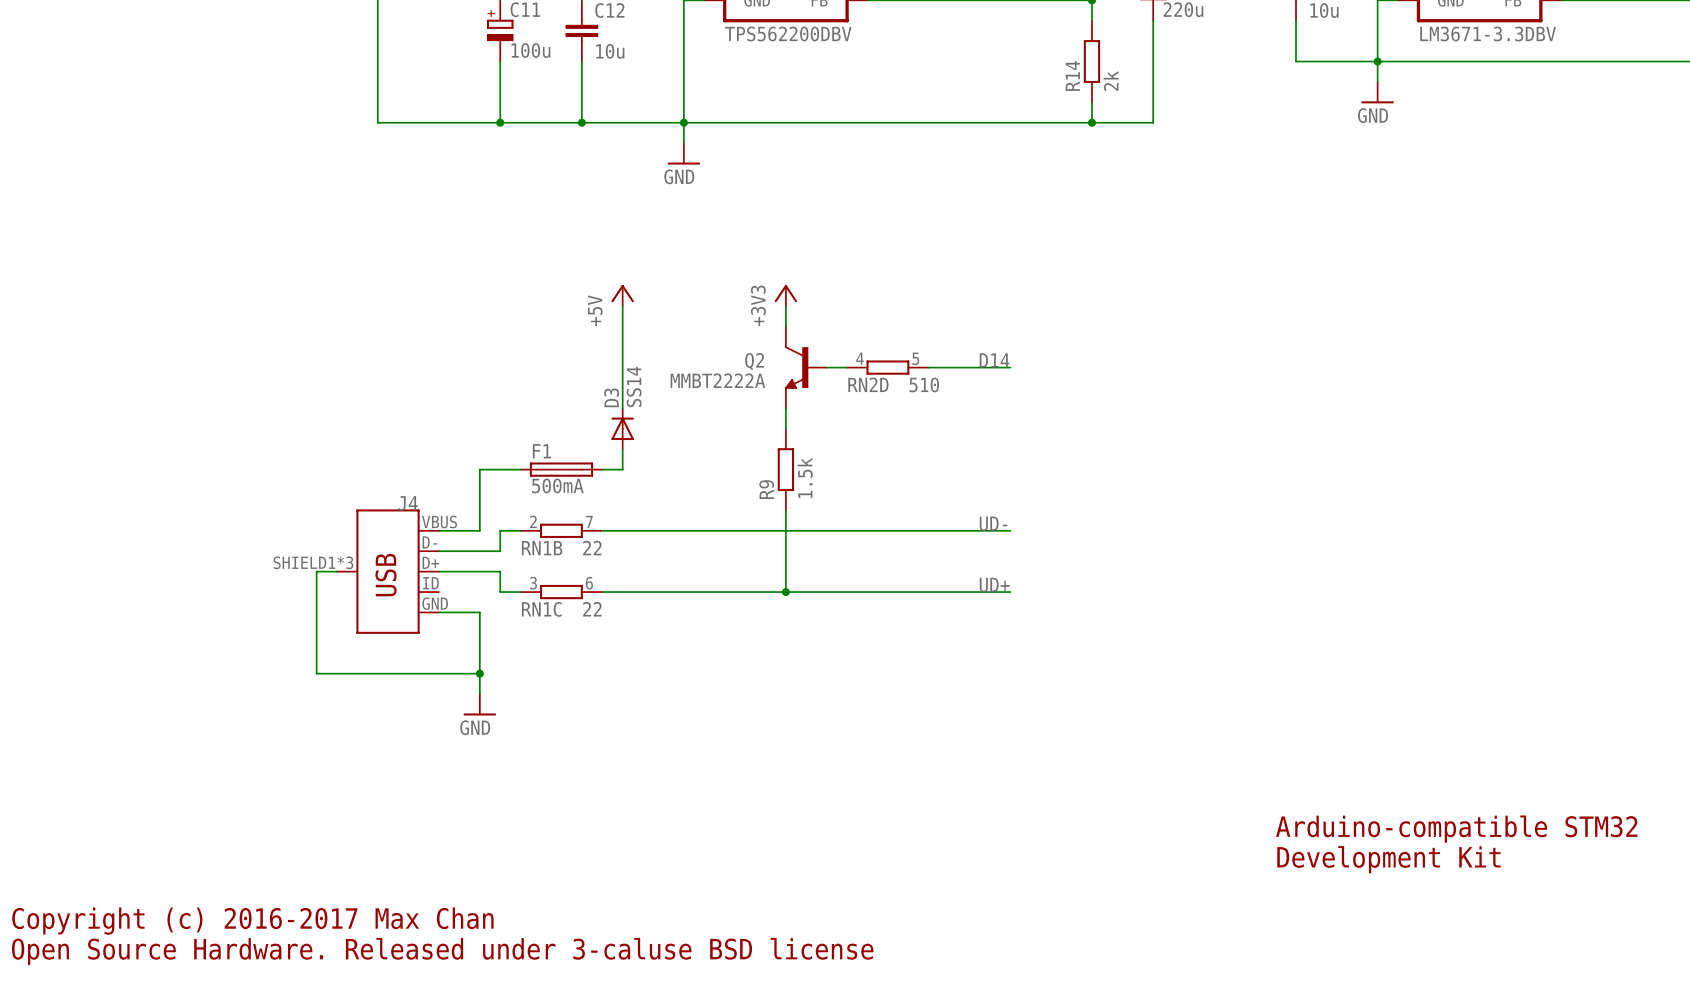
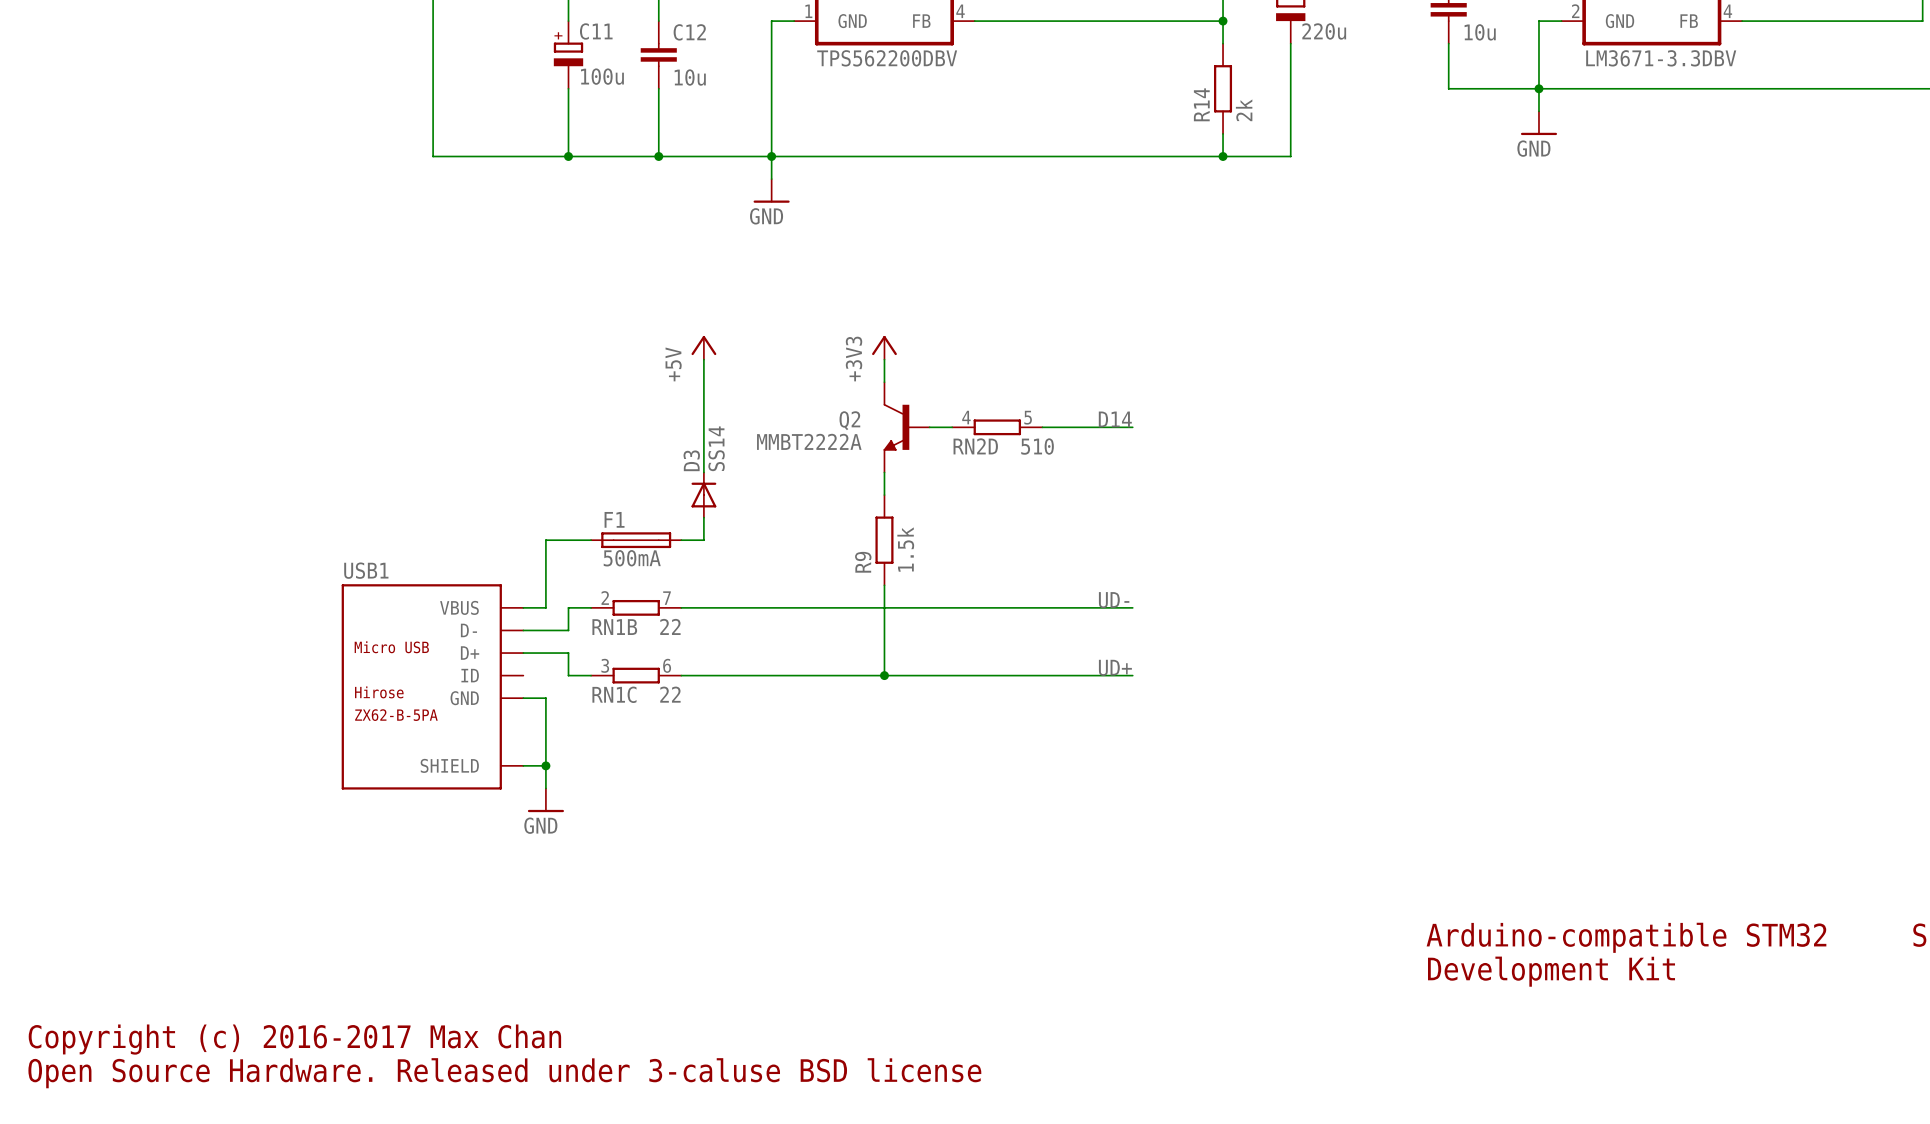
wire: (337, 571) (316, 571) (316, 673) (459, 673) -> none
J4: (388, 571) -> none
USB1: none -> (432, 686)

